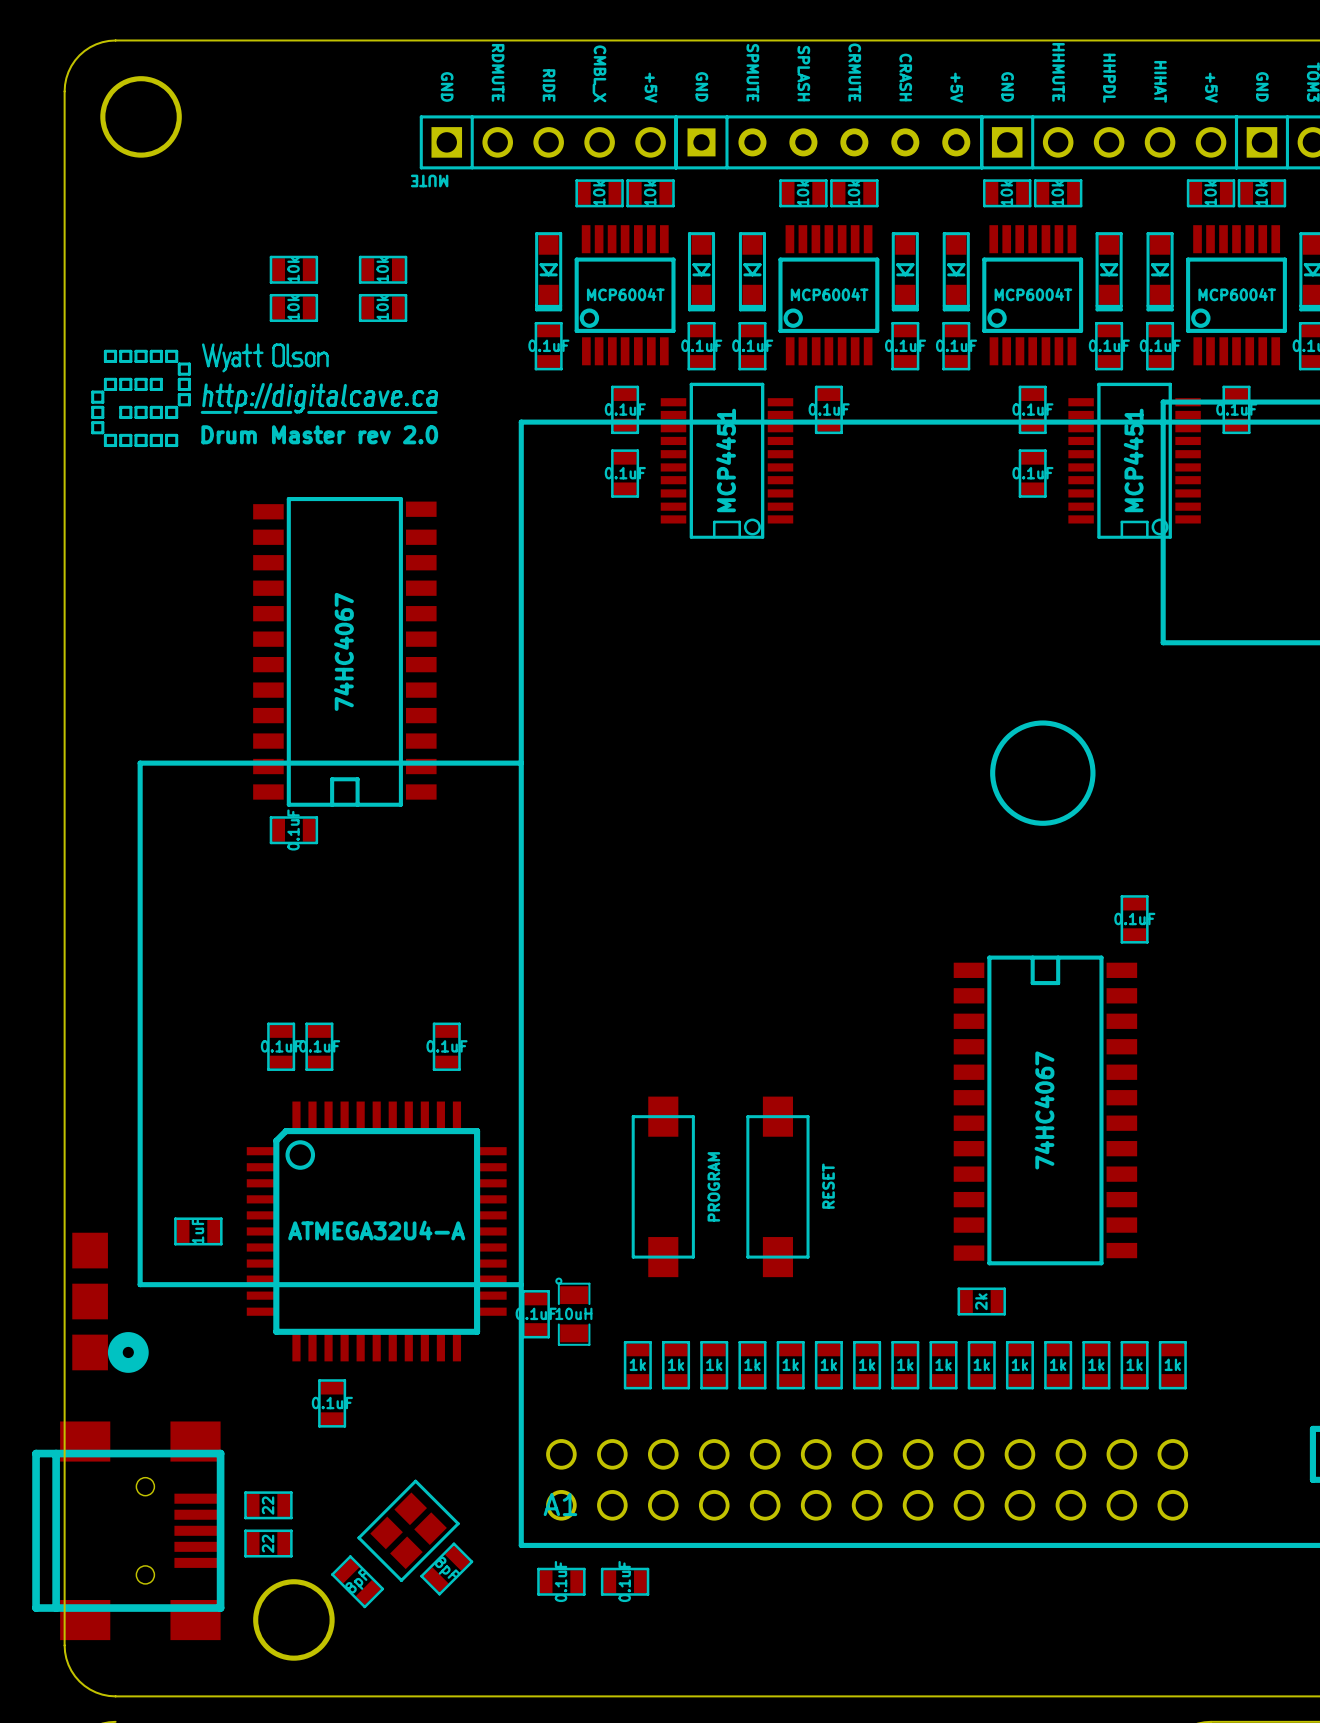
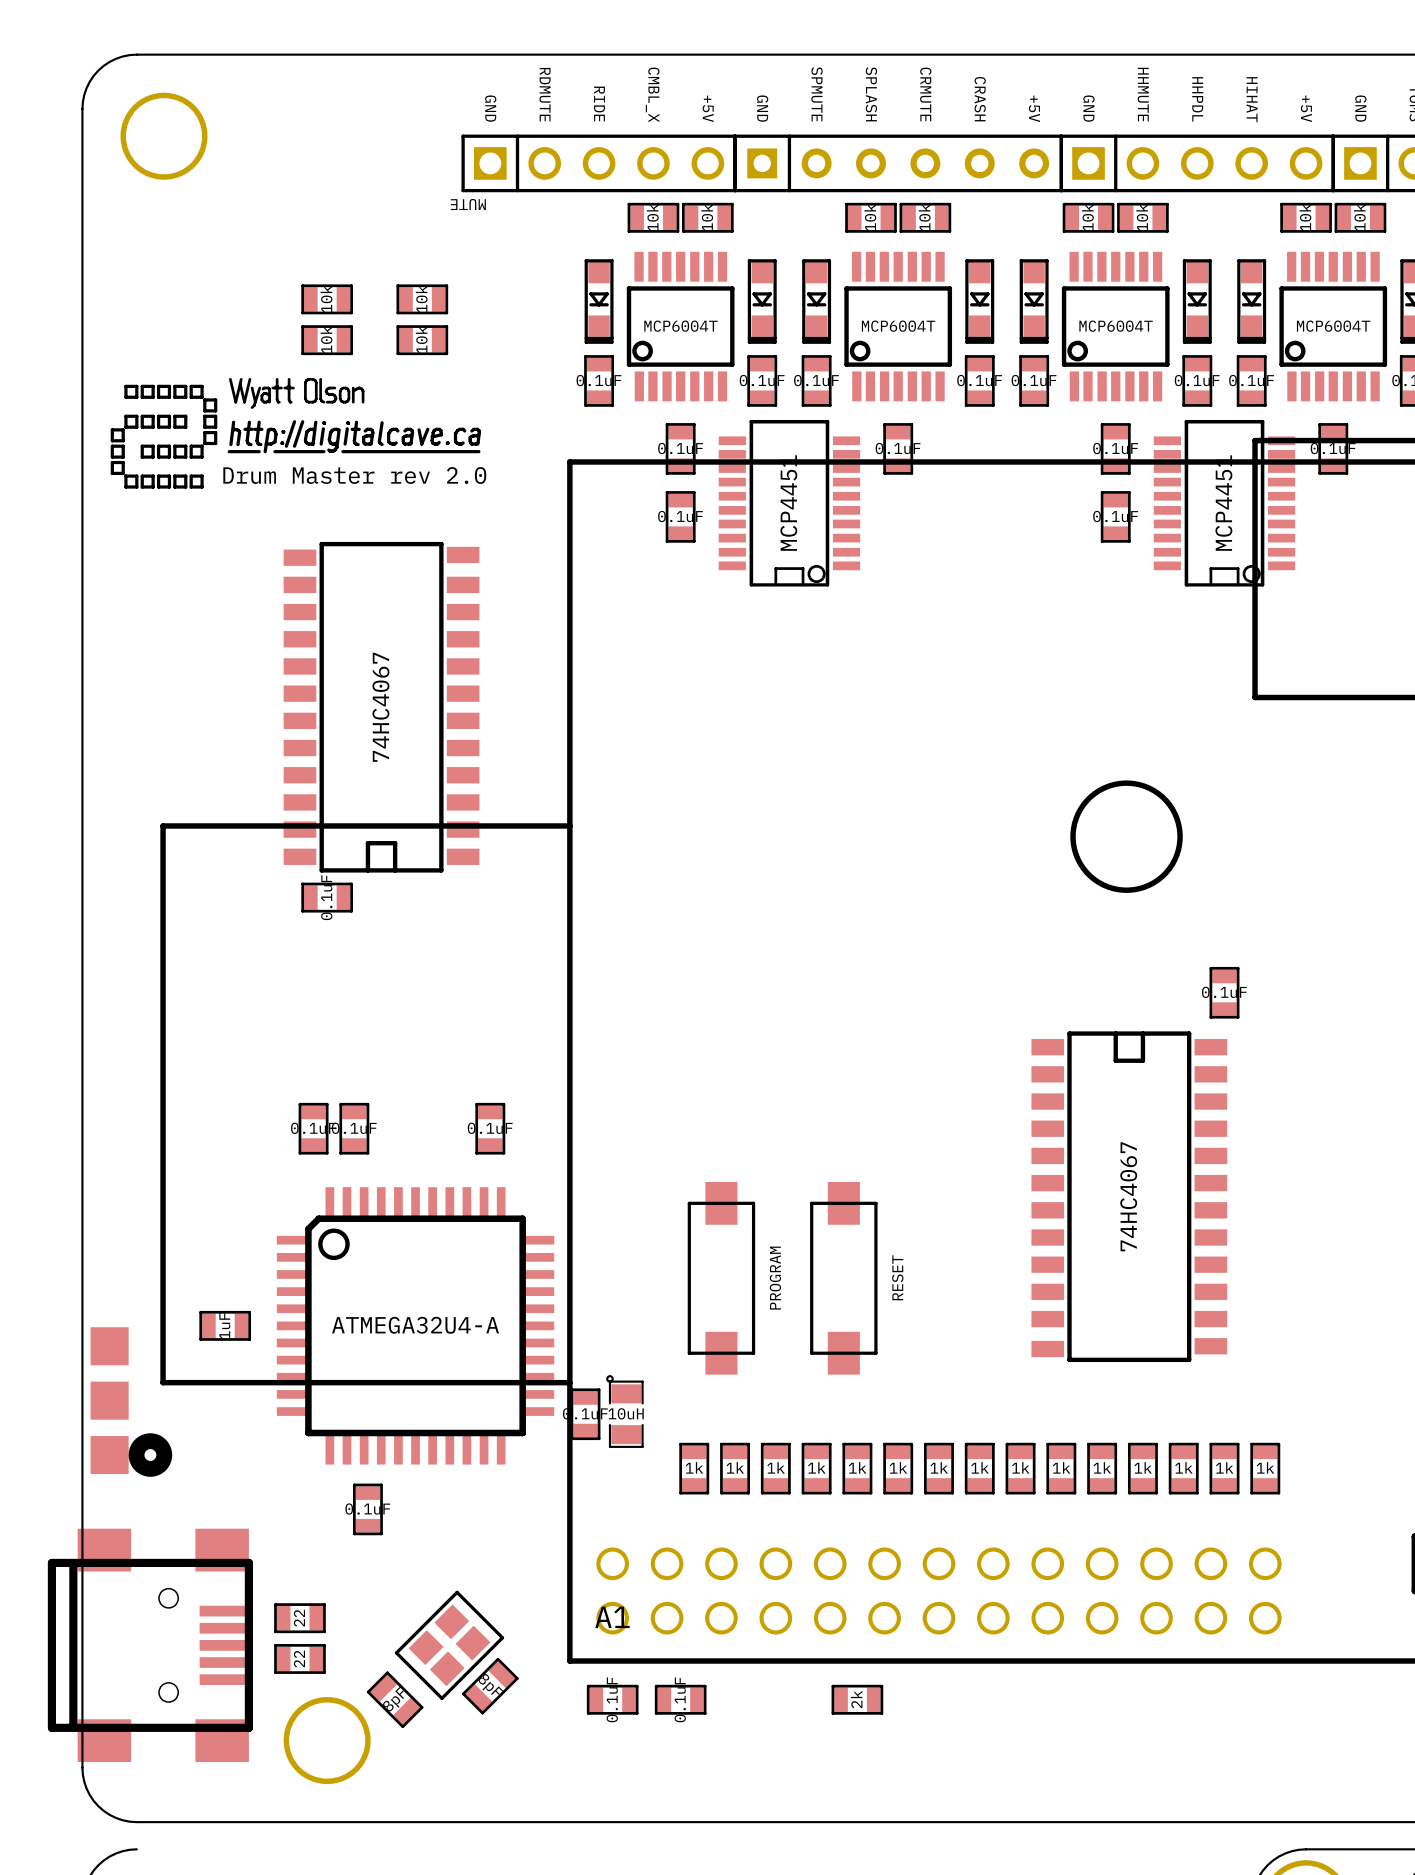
part position: (981, 1301) -> (857, 1699)

